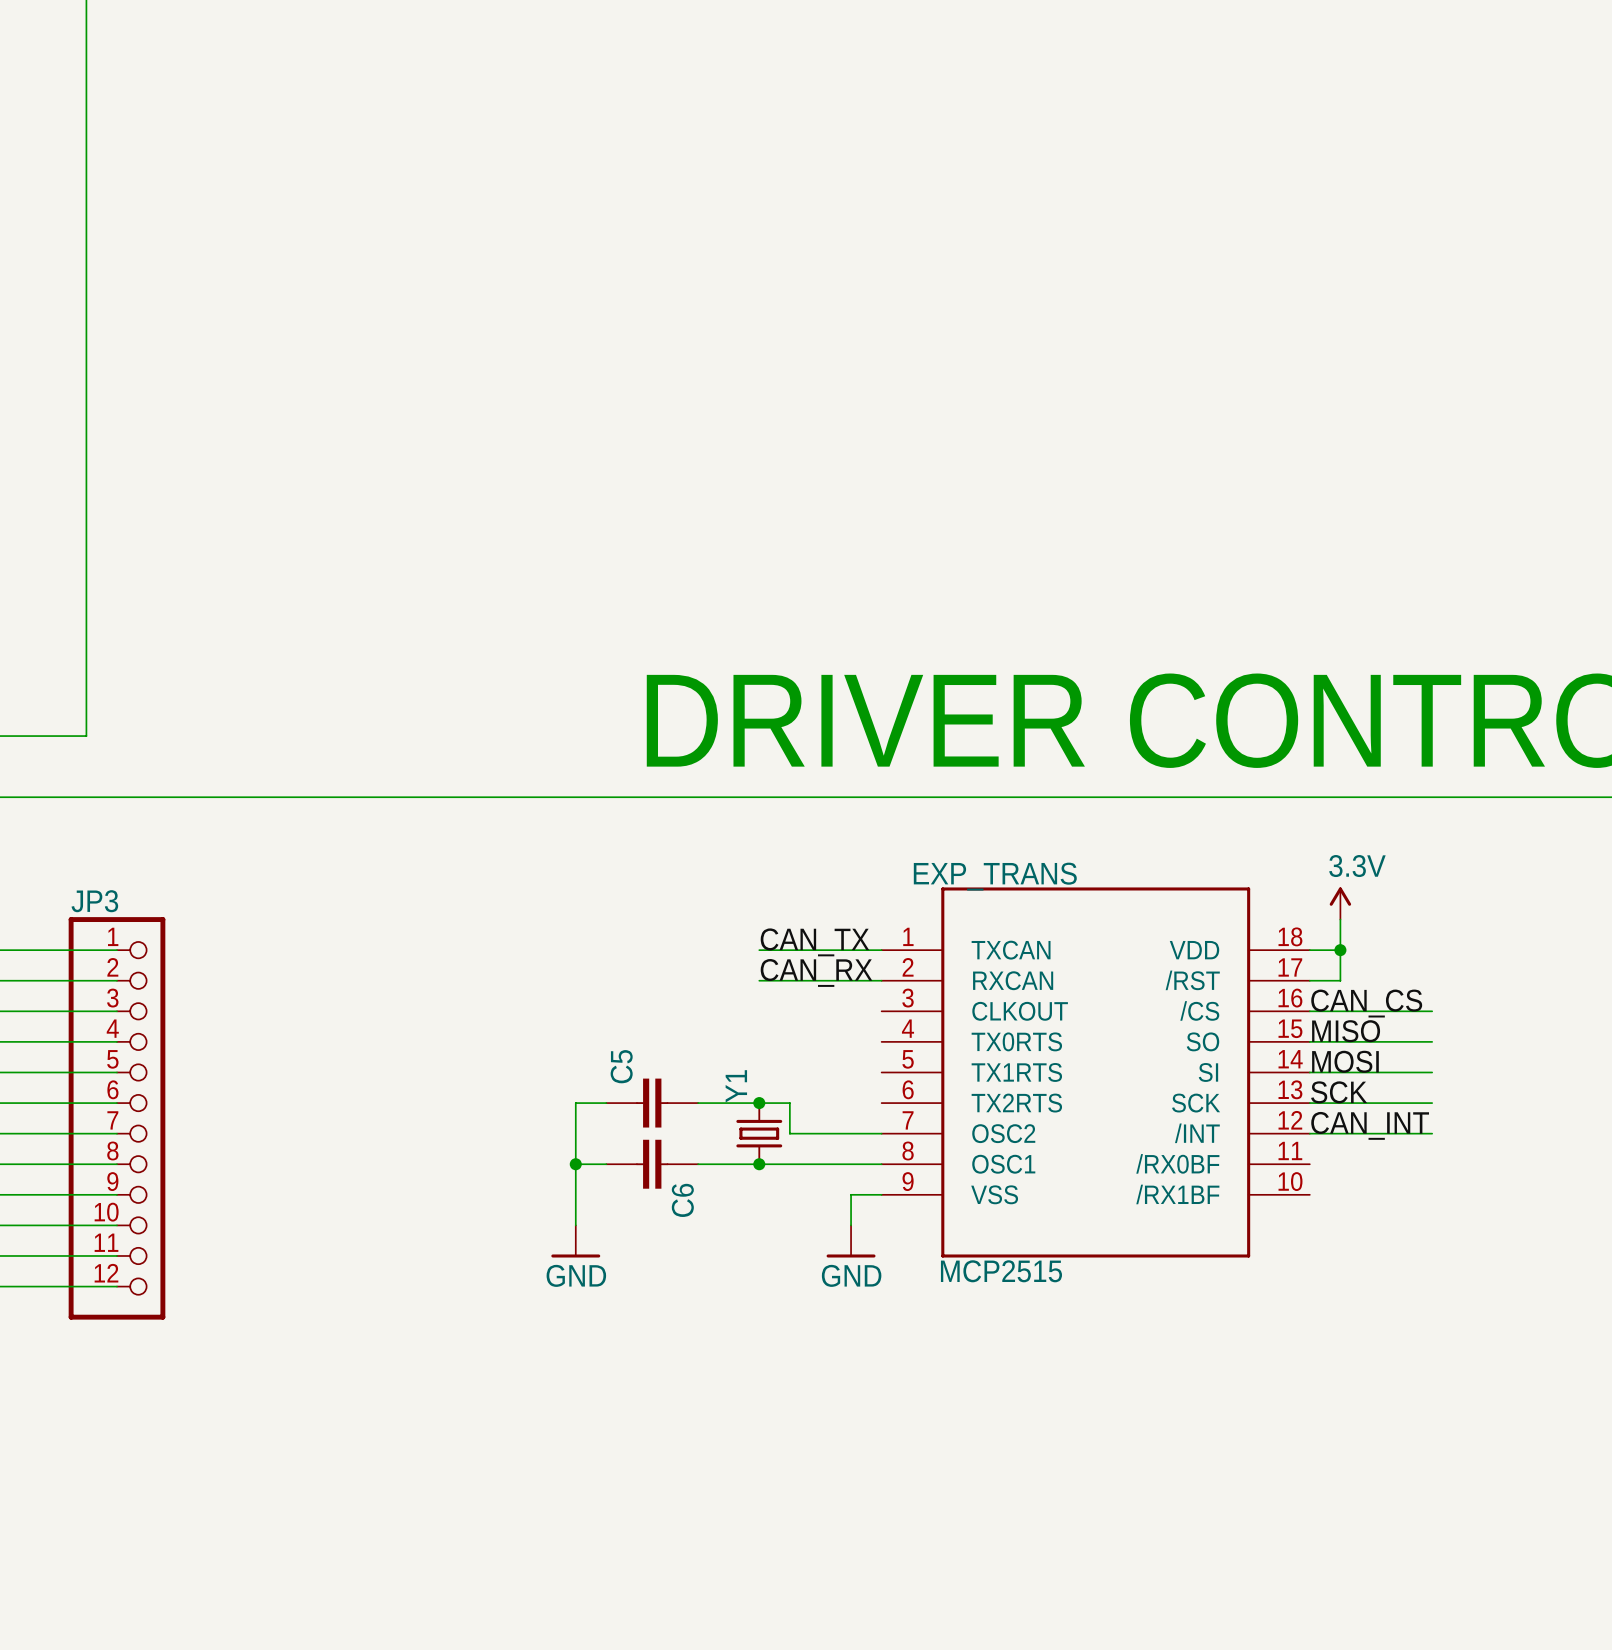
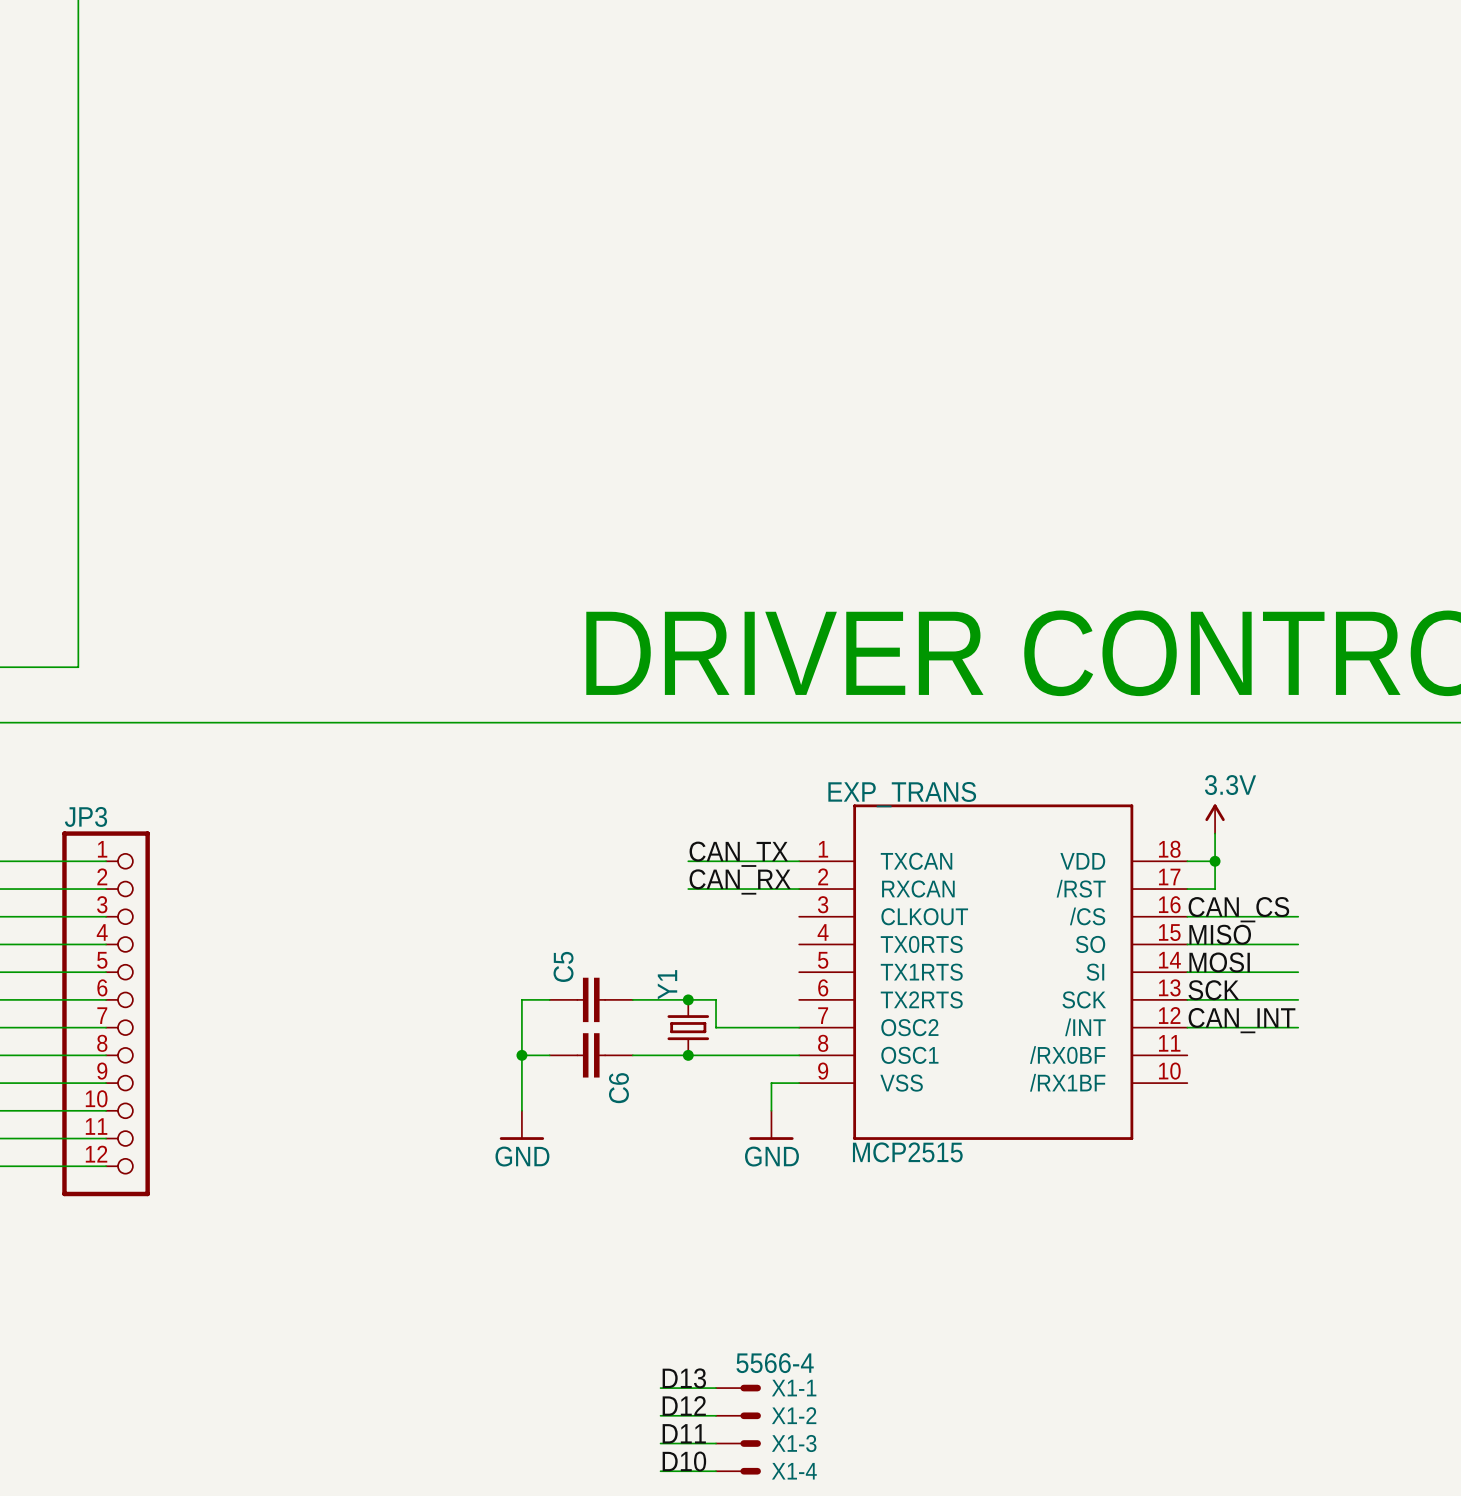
label: none -> D13 (684, 1378)
wire: none -> (660, 1388) (716, 1388)
X1-1: none -> 5566-4 (738, 1388)
label: none -> D12 (684, 1405)
wire: none -> (660, 1415) (716, 1415)
X1-2: none -> (738, 1415)
label: none -> D11 (684, 1433)
wire: none -> (660, 1443) (716, 1443)
X1-3: none -> (738, 1443)
label: none -> D10 (684, 1461)
wire: none -> (660, 1471) (716, 1471)
X1-4: none -> (738, 1471)

